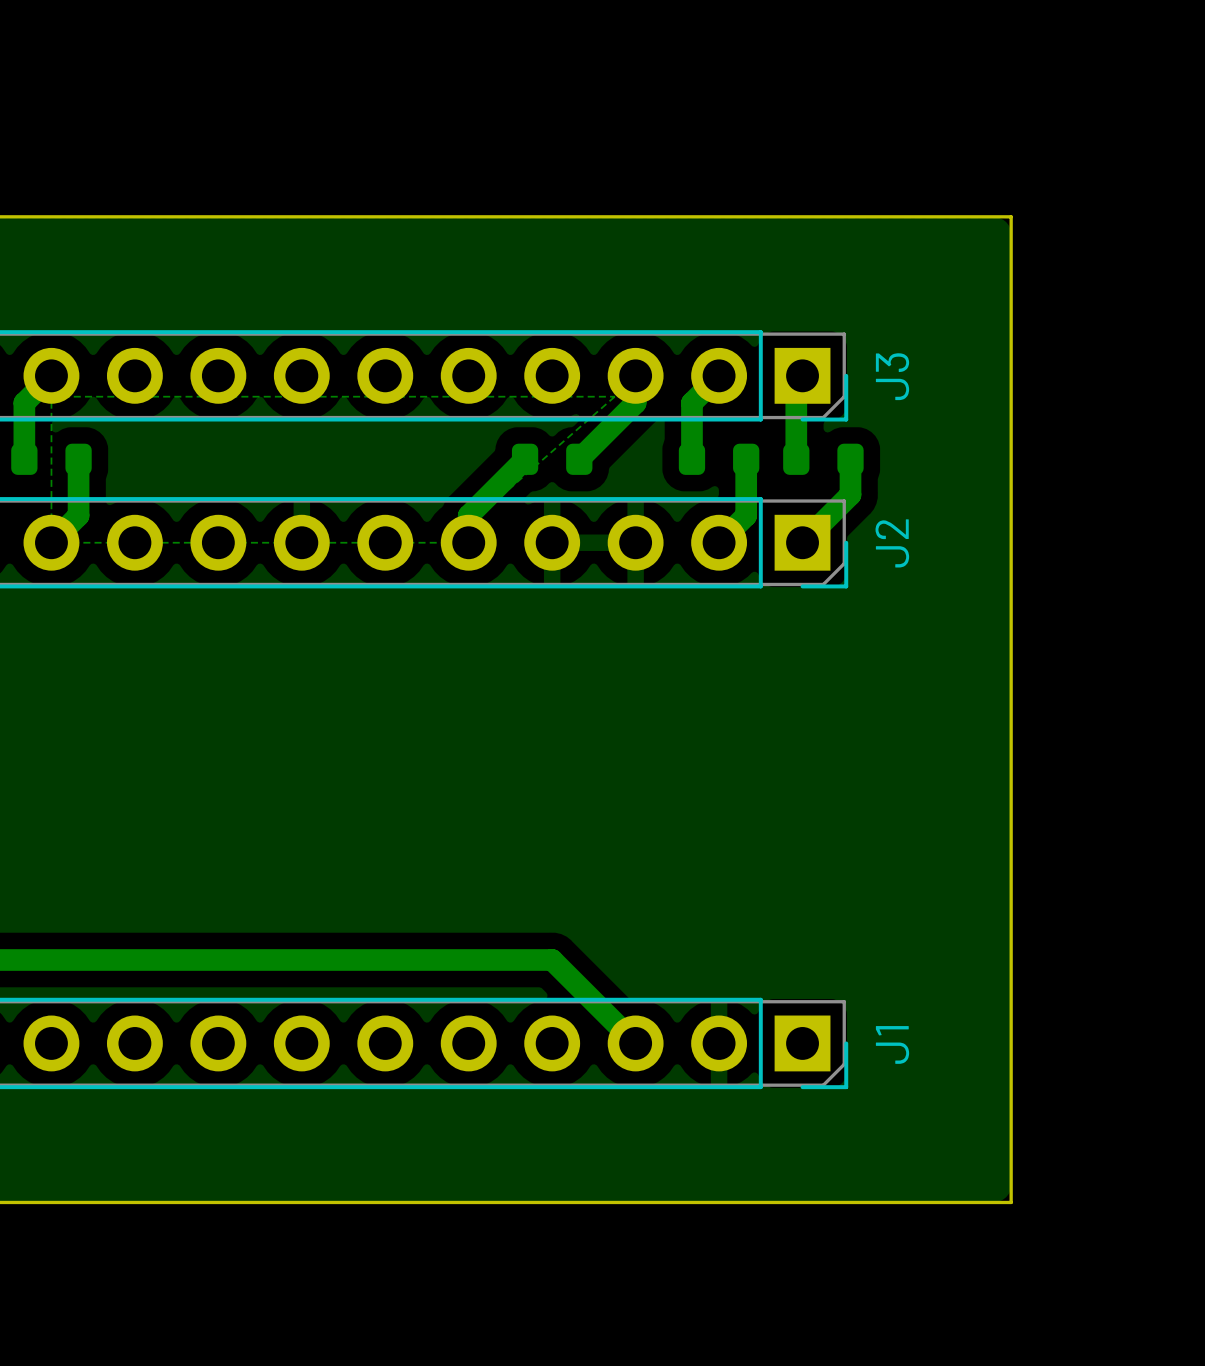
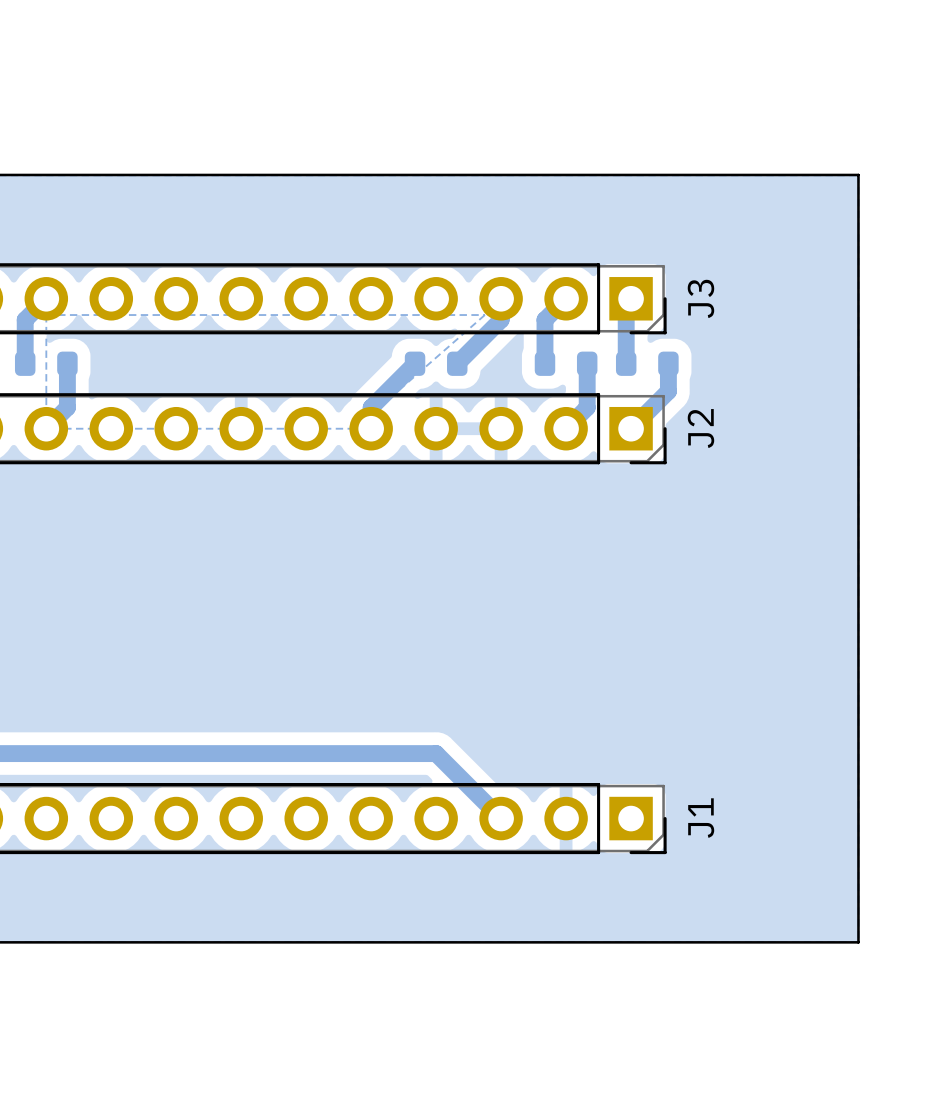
board edge: (1011, 216) (1011, 1202) -> (793, 174) (858, 174) (858, 942) (793, 942)

